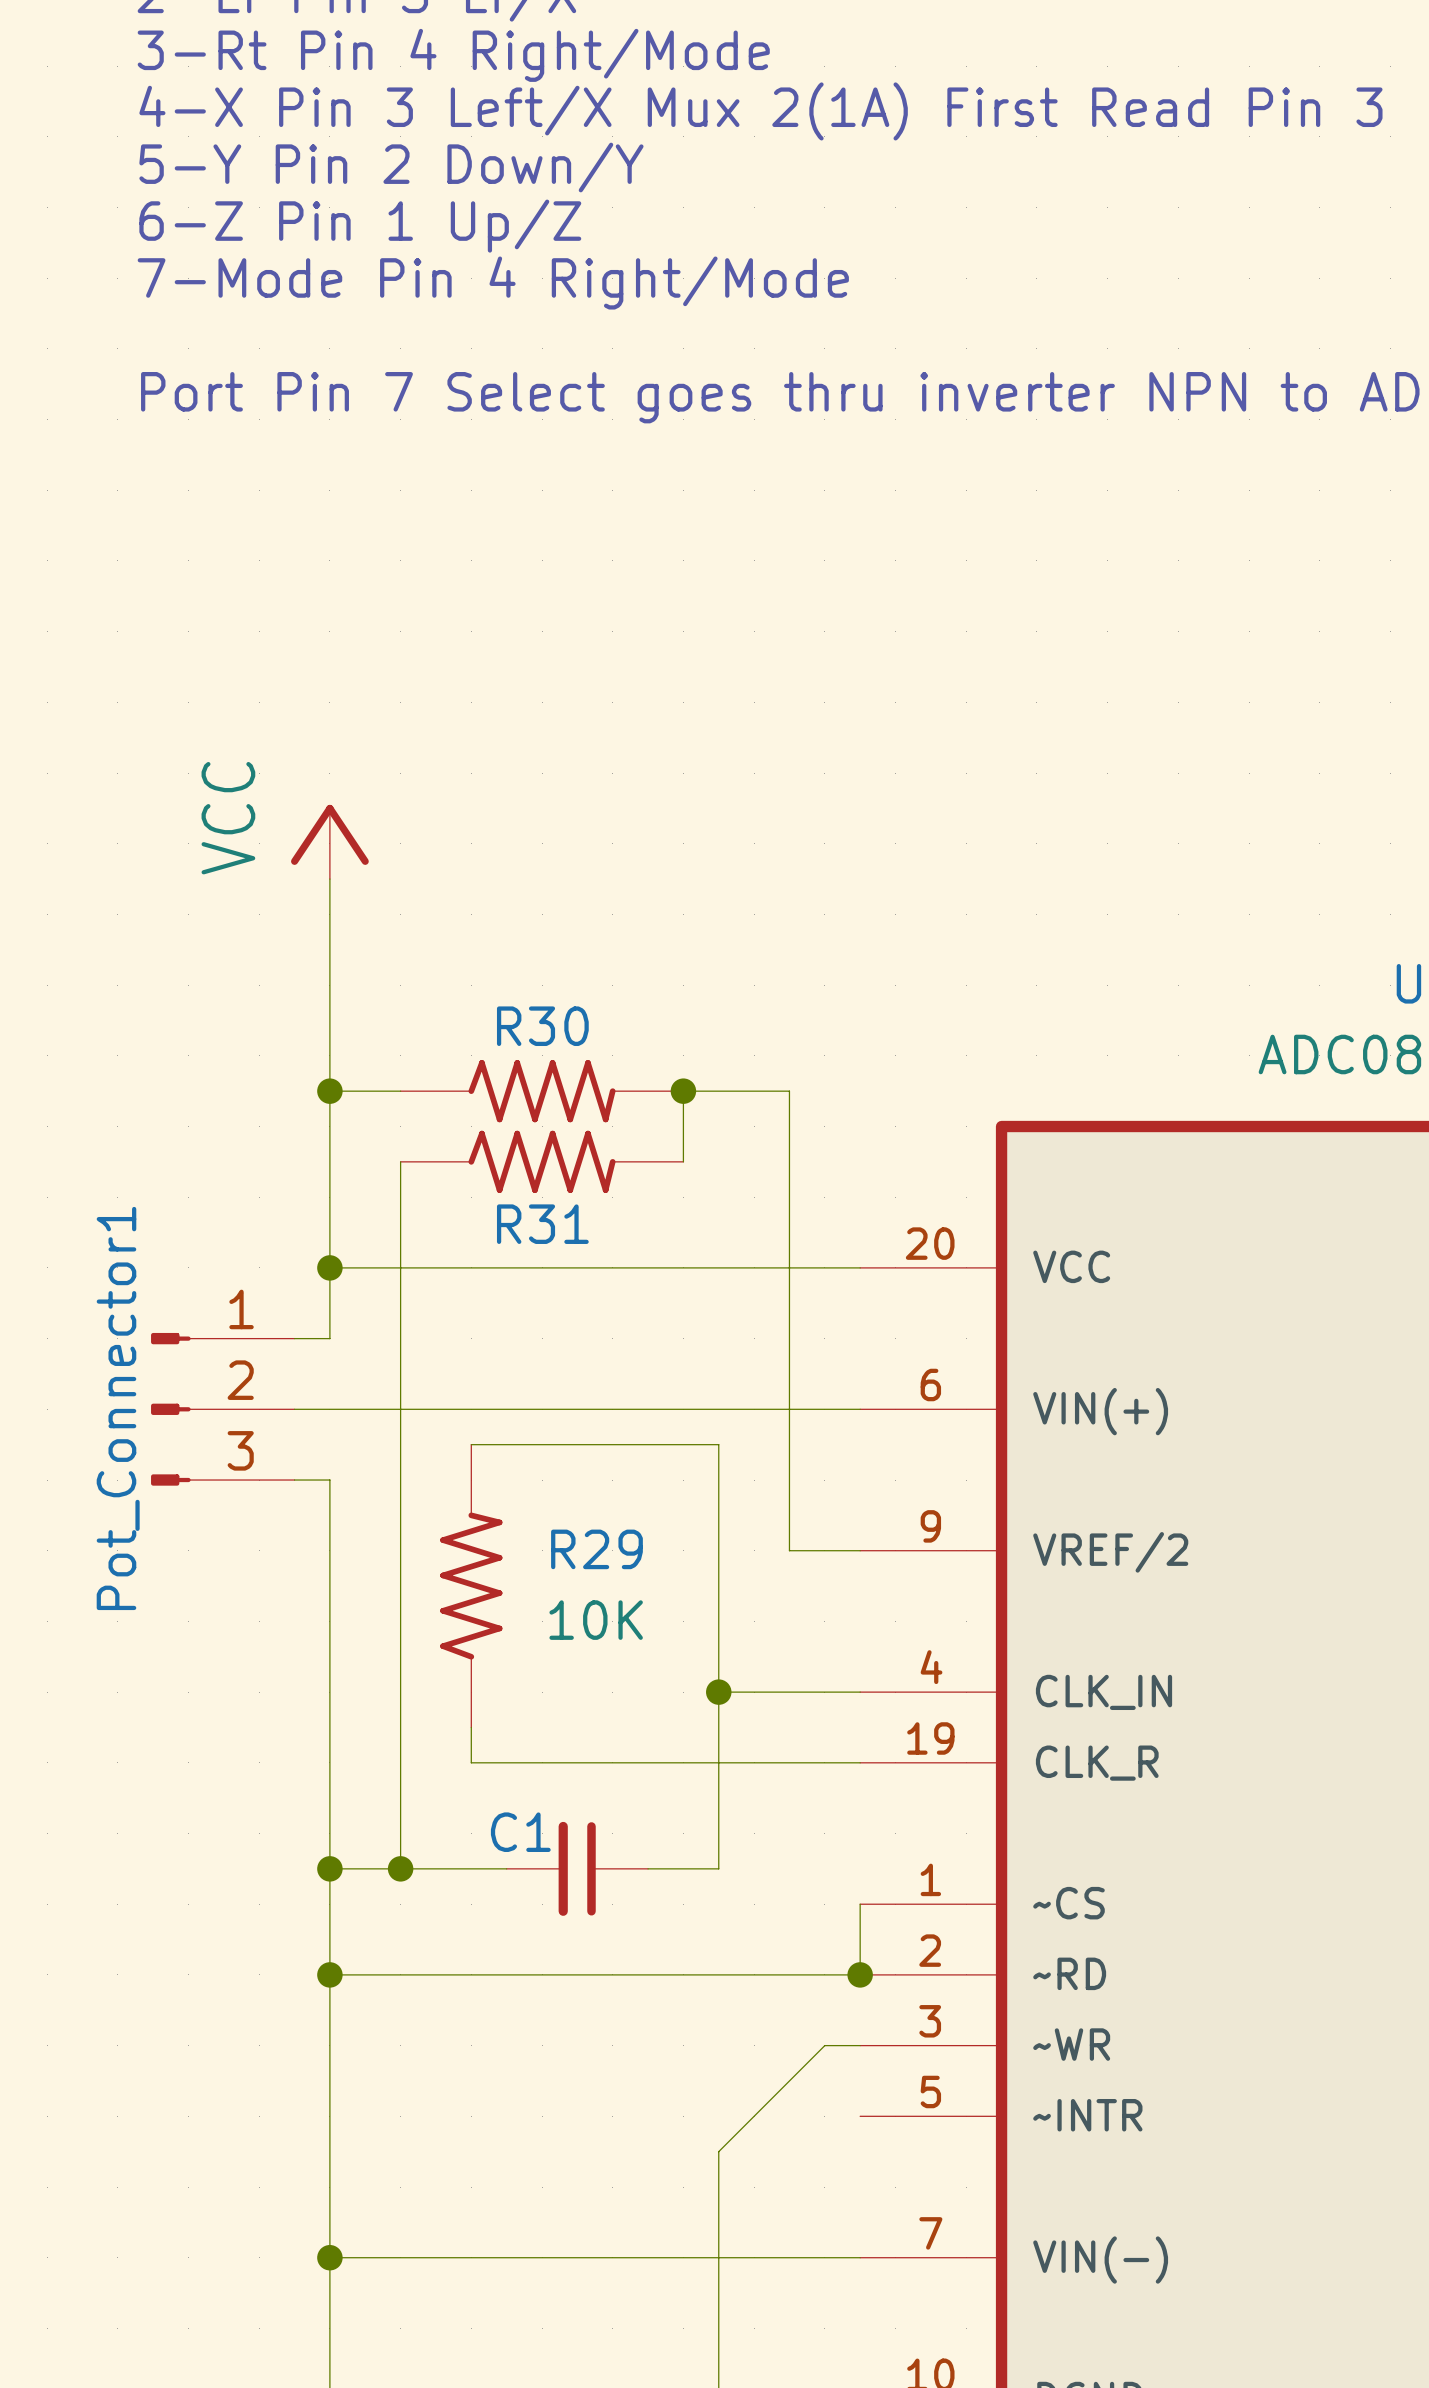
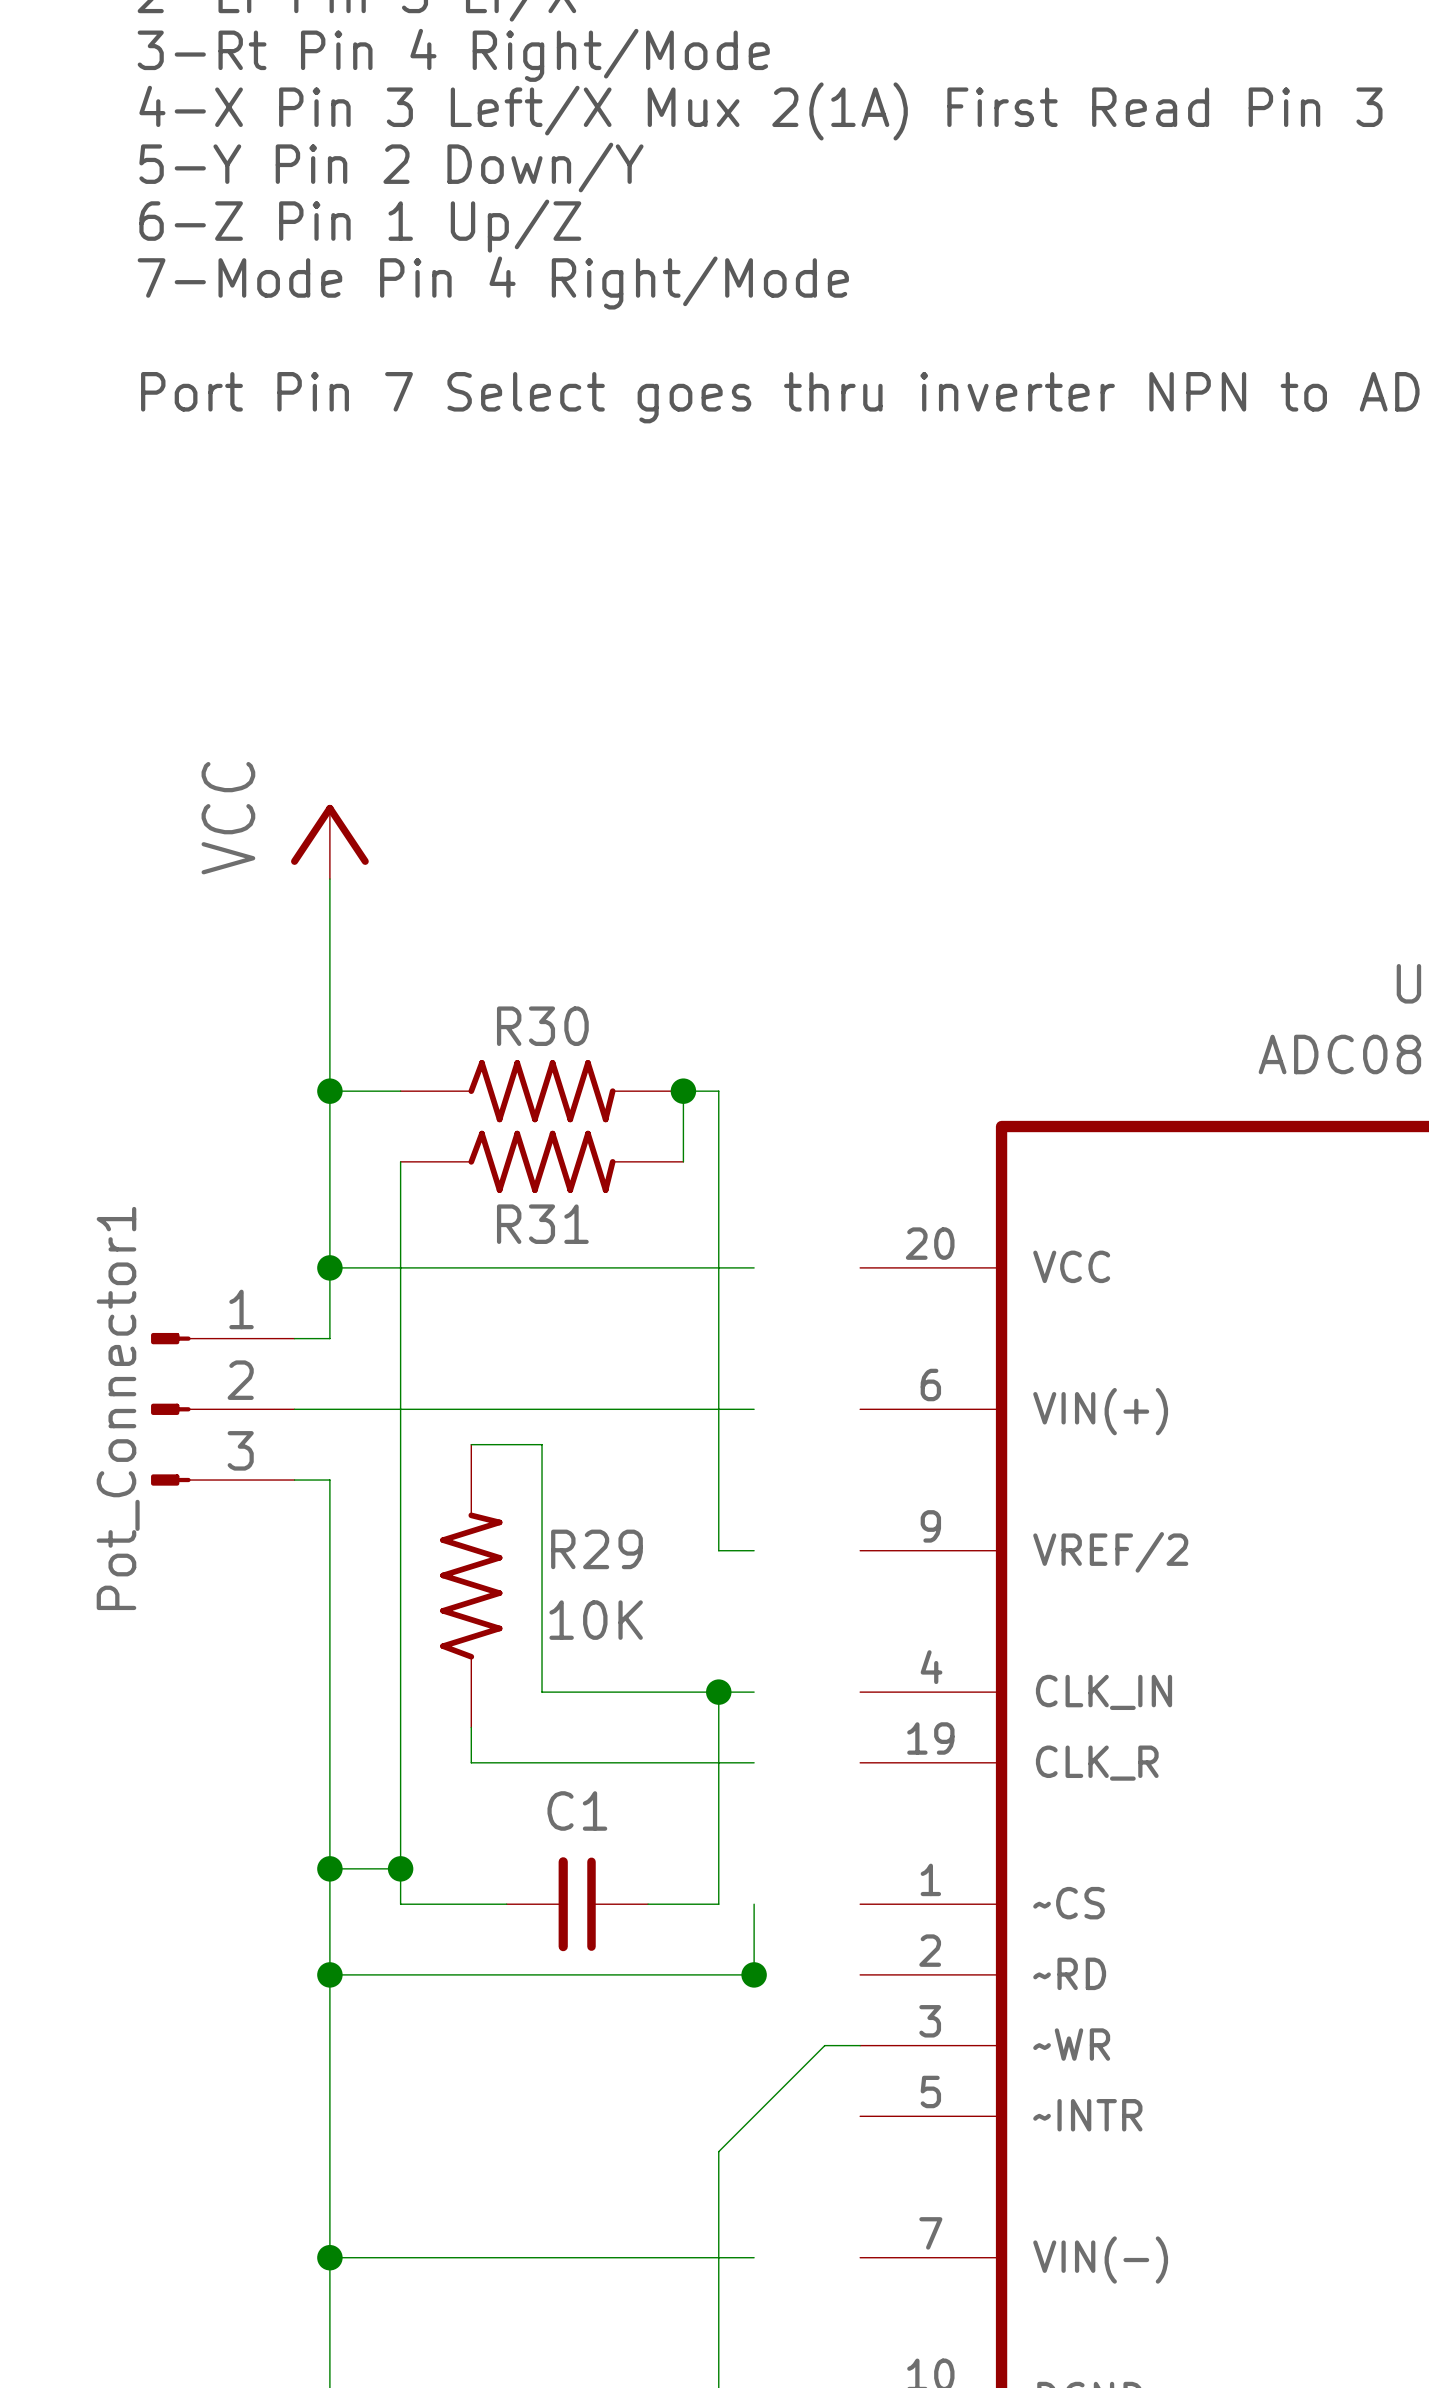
wire: (718, 1091) (789, 1091) (789, 1550) (860, 1550) -> (718, 1091) (718, 1444)
wire: (754, 1267) (860, 1267) -> none
wire: (754, 1409) (860, 1409) -> none
wire: (542, 1444) (718, 1444) -> (542, 1444) (542, 1692) (718, 1692)
wire: (718, 1550) (718, 1692) -> (718, 1550) (754, 1550)
wire: (754, 1692) (860, 1692) -> none
wire: (754, 1762) (860, 1762) -> none
C1 name position: C1 (520, 1832) -> C1 (577, 1810)
wire: (400, 1868) (506, 1868) -> (400, 1868) (400, 1904) (506, 1904)
C1 position: (577, 1868) -> (577, 1904)
wire: (648, 1868) (718, 1868) -> (648, 1904) (718, 1904) (718, 1868)
wire: (860, 1904) (860, 1974) (754, 1974) -> (754, 1904) (754, 1974)
junction position: (860, 1974) -> (754, 1974)
wire: (754, 2257) (860, 2257) -> none

